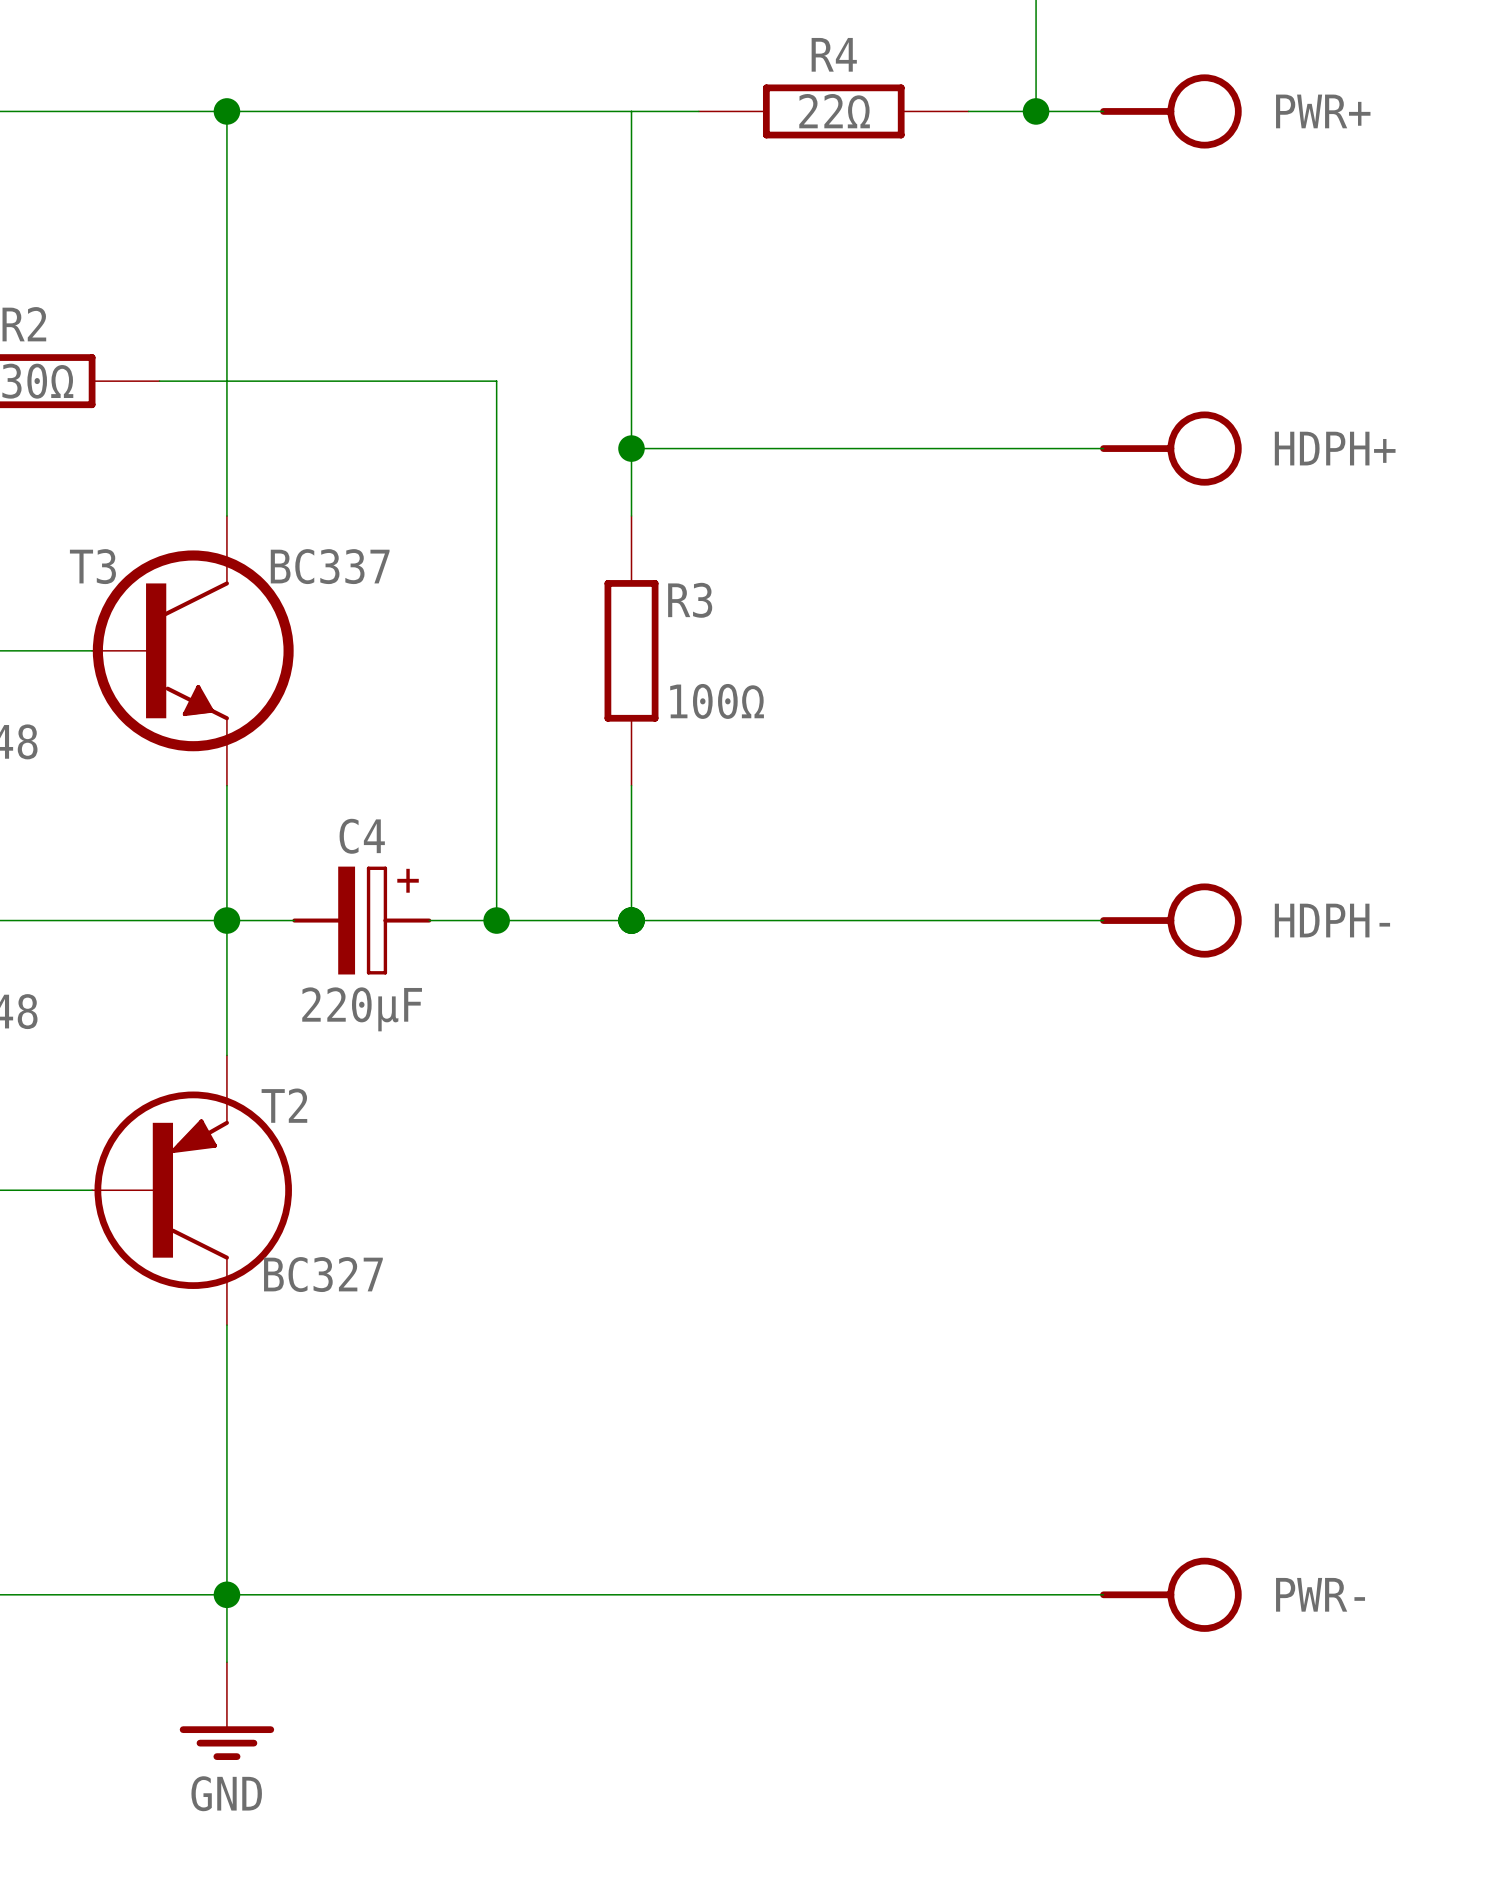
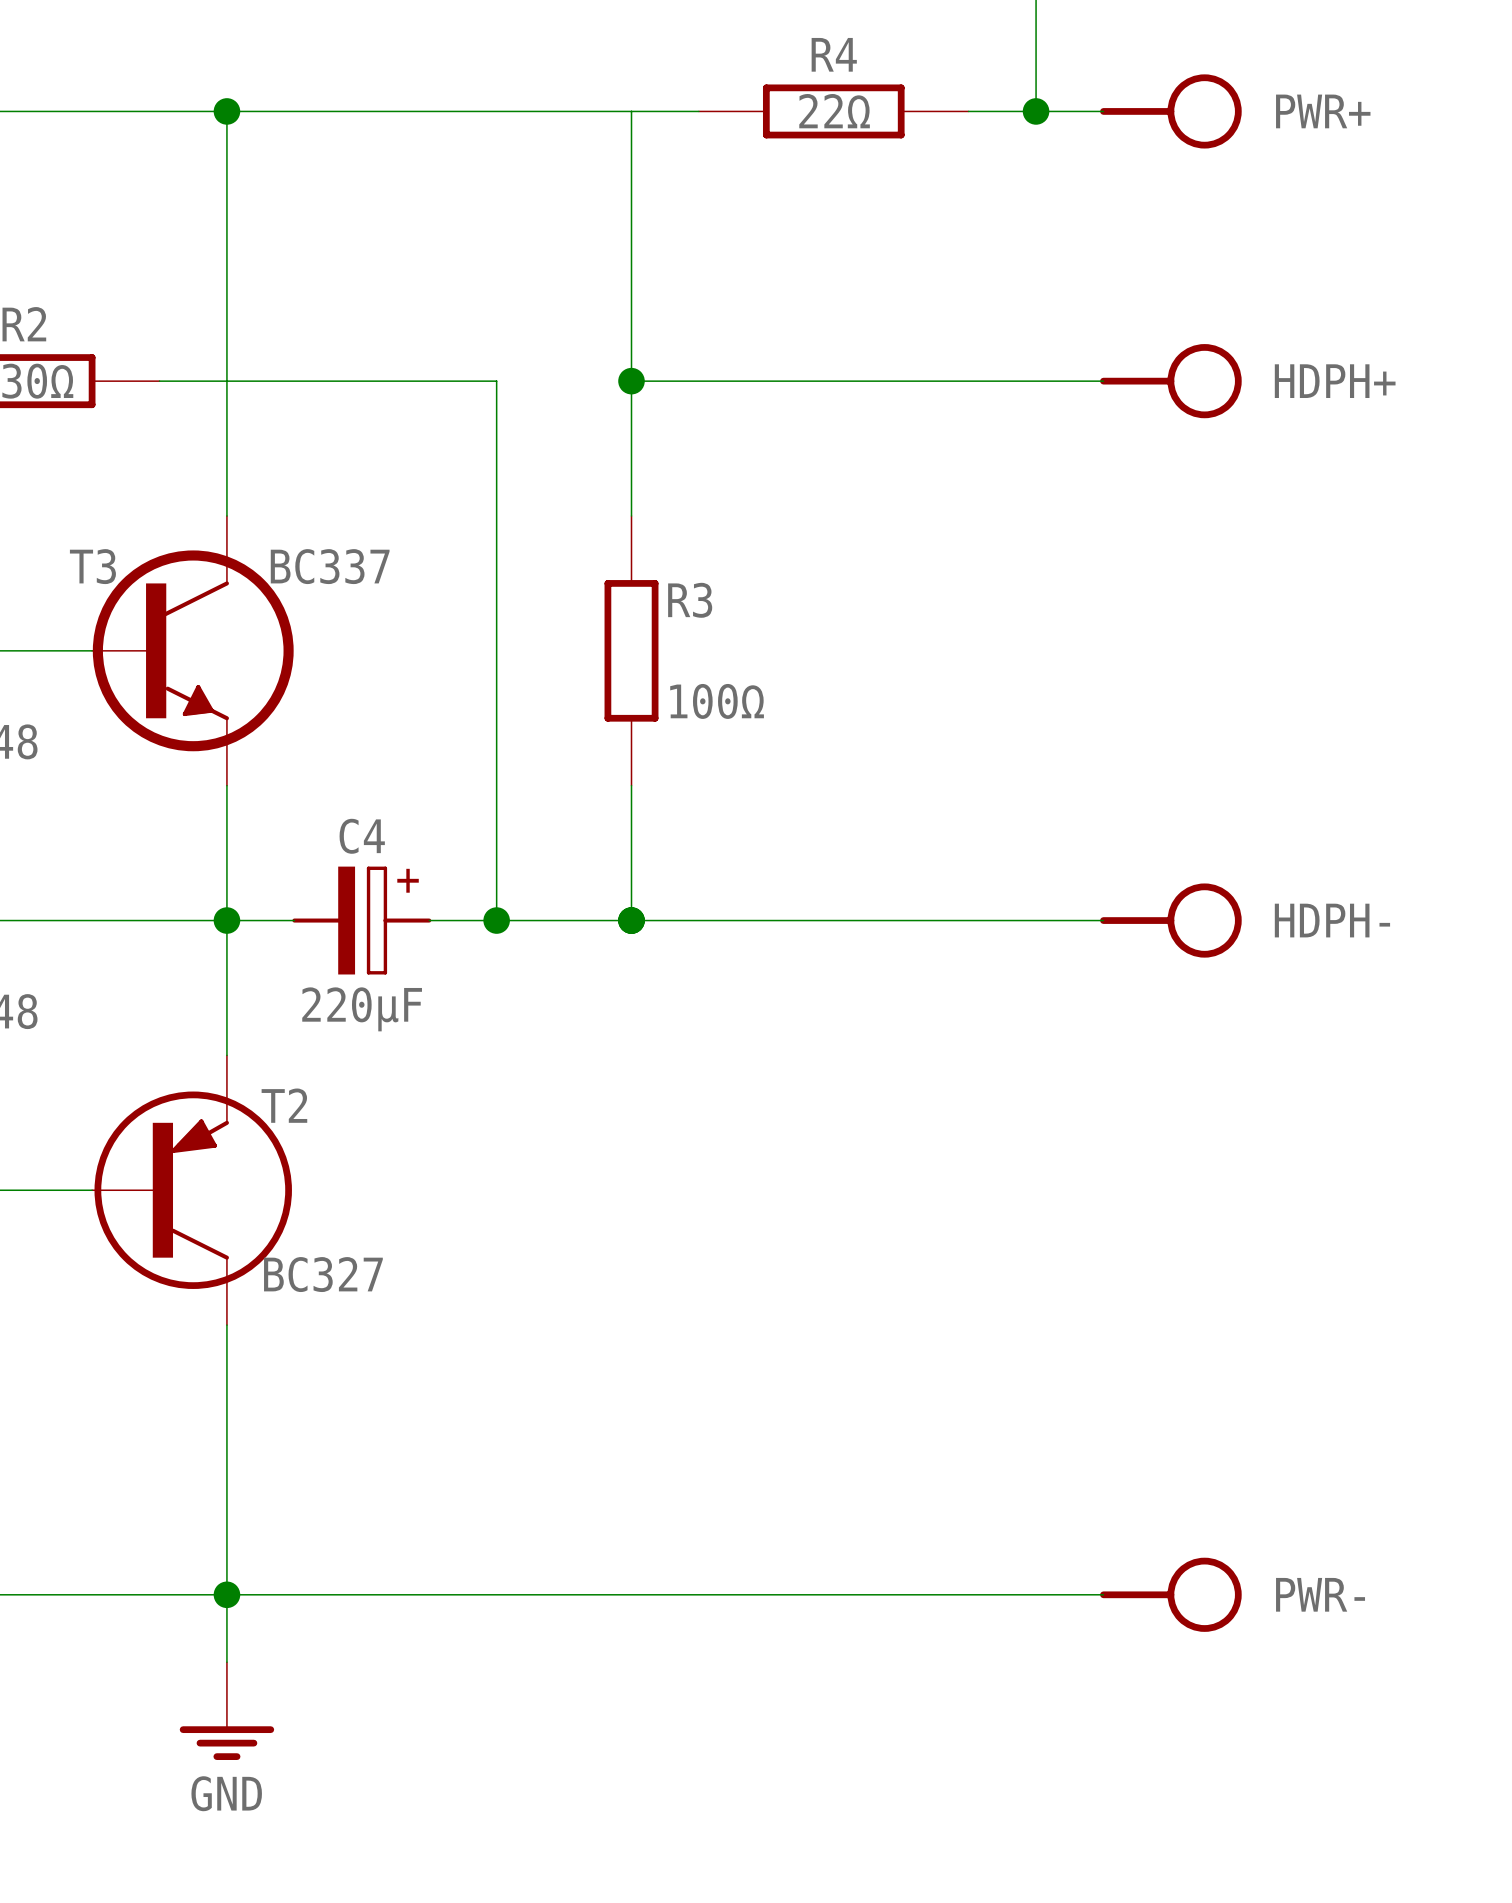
wire: (631, 448) (1103, 448) -> (631, 381) (1103, 381)
junction position: (631, 448) -> (631, 381)
HDPH+ position: (1170, 448) -> (1170, 381)

